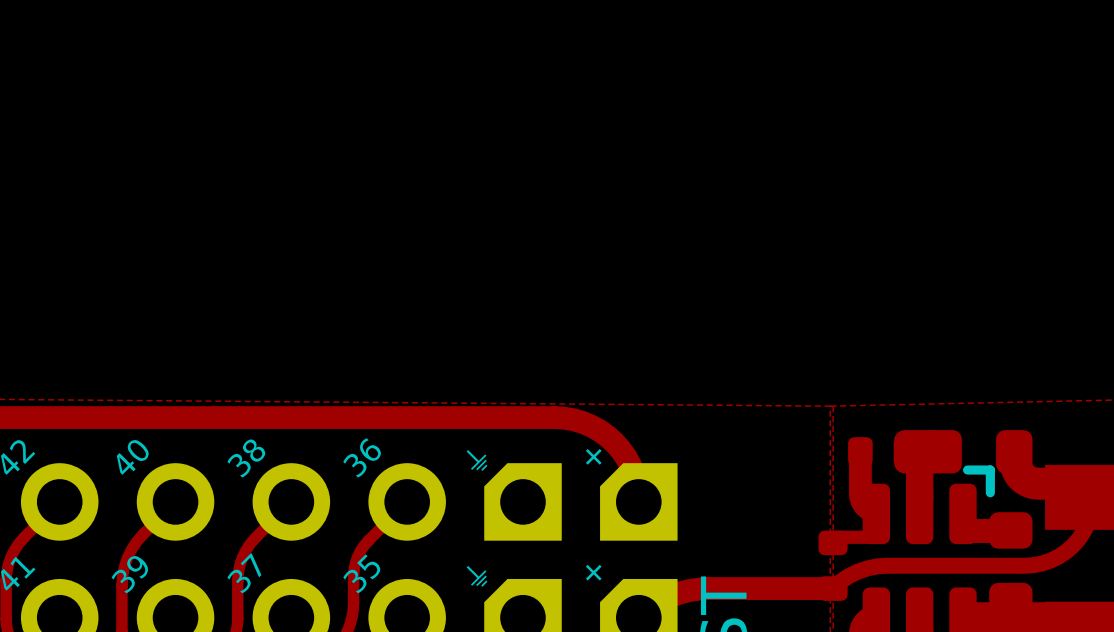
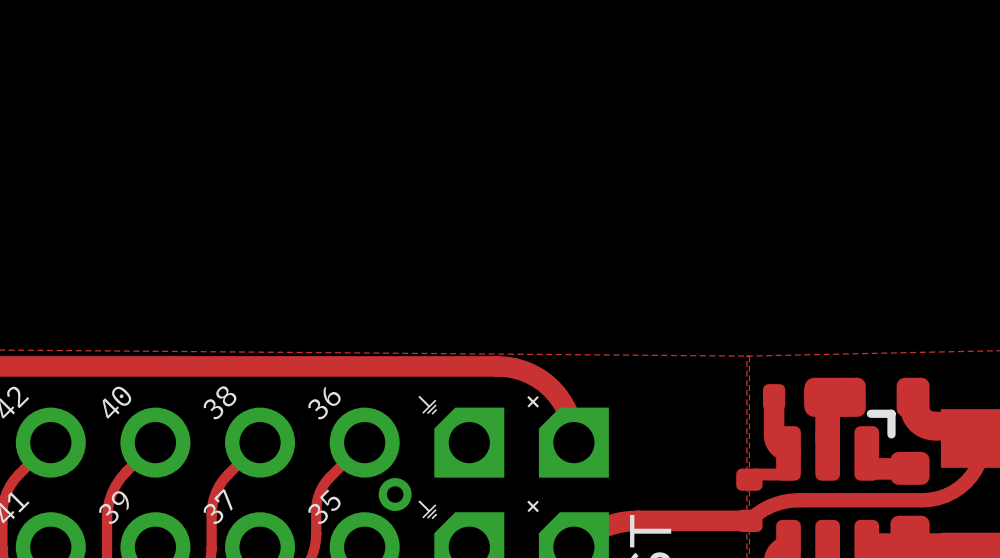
via: none -> (395, 494)

